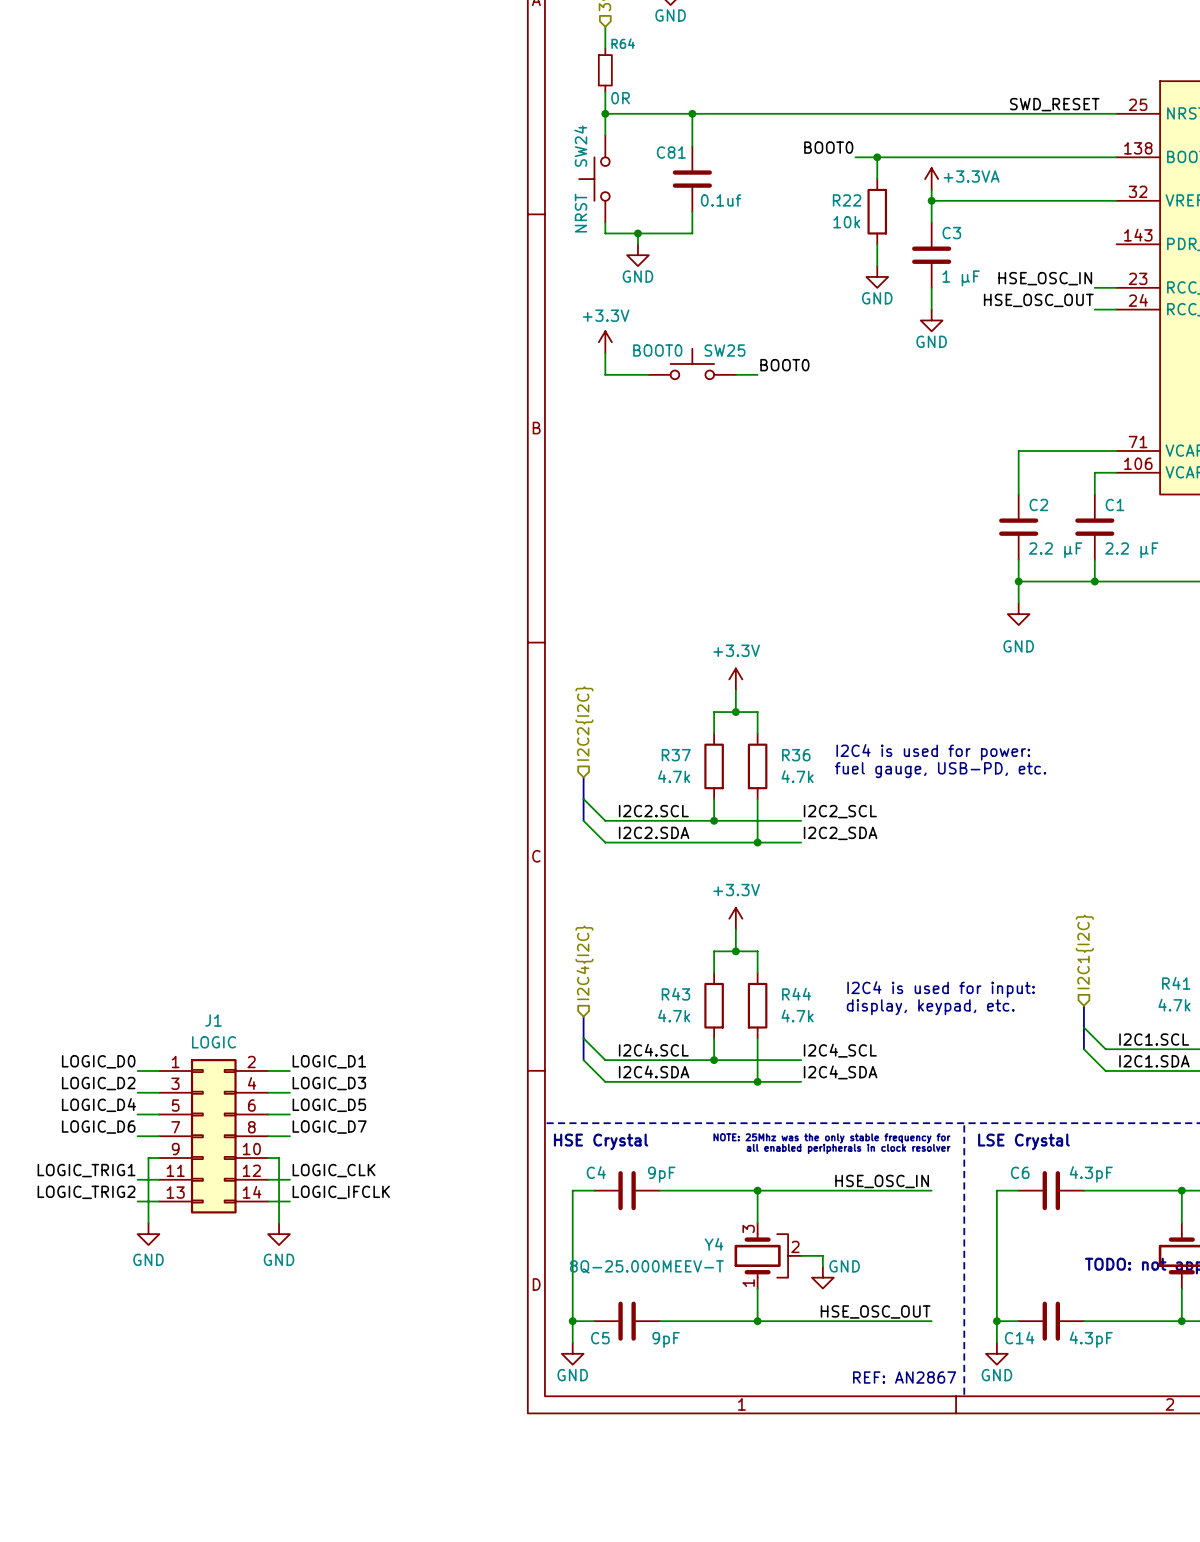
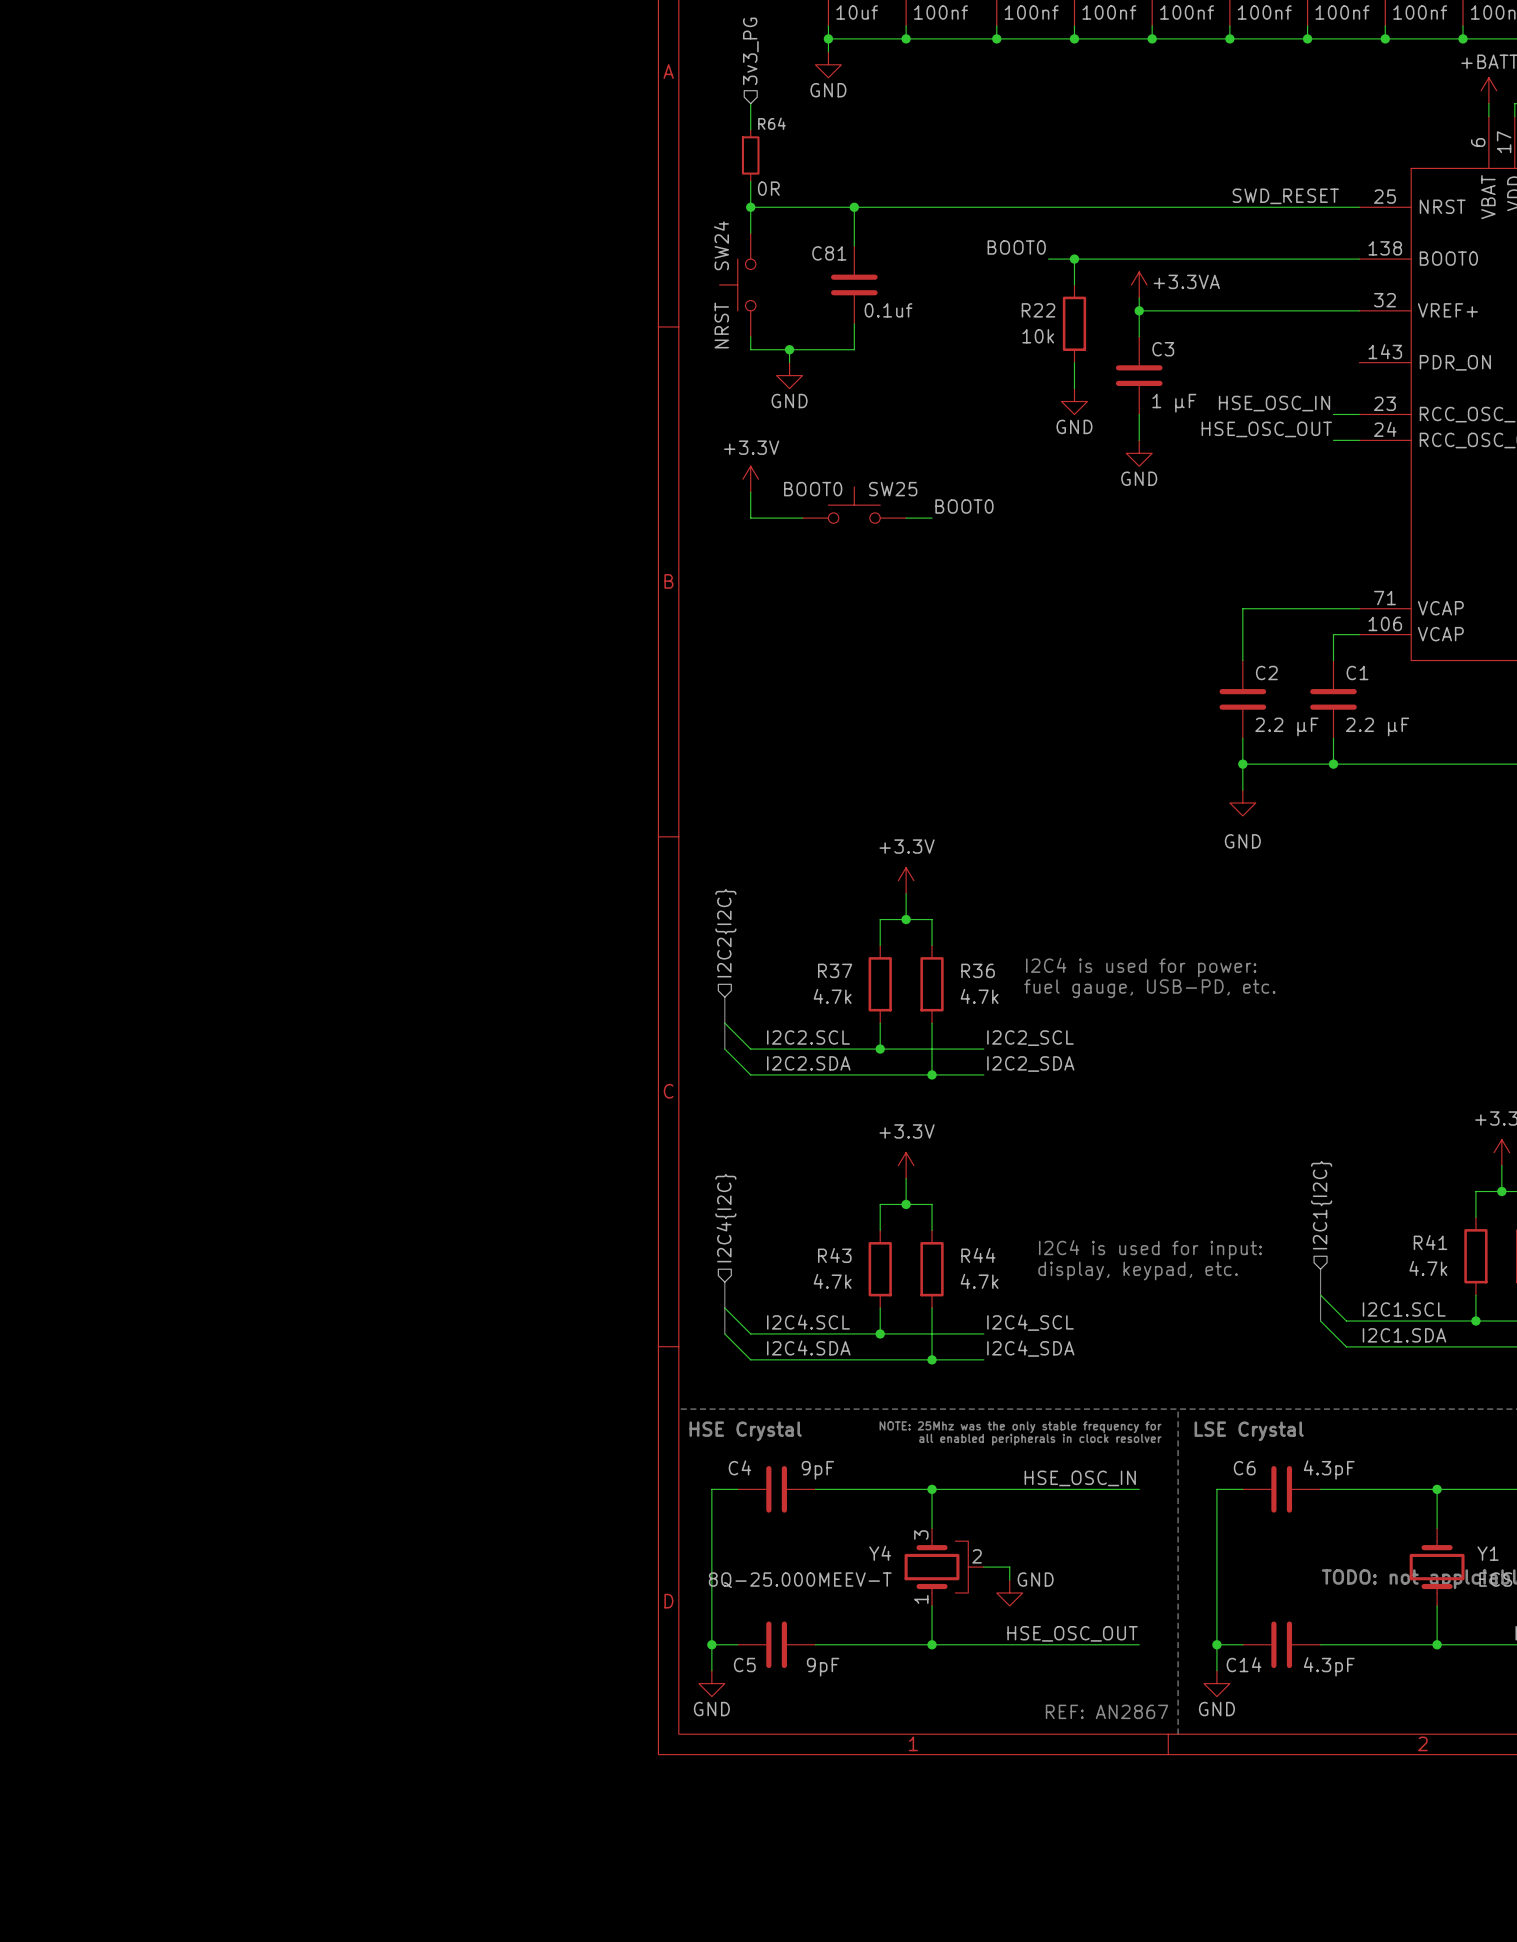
label: LOGIC_D0 (98, 1061) -> none
label: LOGIC_D1 (329, 1061) -> none
wire: (137, 1070) (159, 1070) -> none
wire: (268, 1070) (289, 1070) -> none
label: LOGIC_D2 (98, 1083) -> none
label: LOGIC_D3 (329, 1083) -> none
wire: (137, 1092) (159, 1092) -> none
wire: (268, 1092) (289, 1092) -> none
label: LOGIC_D4 (98, 1105) -> none
label: LOGIC_D5 (329, 1105) -> none
wire: (137, 1114) (159, 1114) -> none
wire: (268, 1114) (289, 1114) -> none
label: LOGIC_D6 (98, 1127) -> none
label: LOGIC_D7 (329, 1127) -> none
wire: (137, 1136) (159, 1136) -> none
J1: LOGIC (213, 1136) -> none
wire: (268, 1136) (289, 1136) -> none
wire: (159, 1158) (148, 1158) (148, 1223) -> none
wire: (268, 1158) (279, 1158) (279, 1223) -> none
label: LOGIC_TRIG1 (86, 1170) -> none
label: LOGIC_CLK (334, 1170) -> none
wire: (137, 1179) (159, 1179) -> none
wire: (268, 1179) (289, 1179) -> none
label: LOGIC_TRIG2 (86, 1192) -> none
label: LOGIC_IFCLK (341, 1192) -> none
wire: (137, 1201) (159, 1201) -> none
wire: (268, 1201) (289, 1201) -> none
power symbol: GND (148, 1234) -> none
power symbol: GND (279, 1234) -> none

